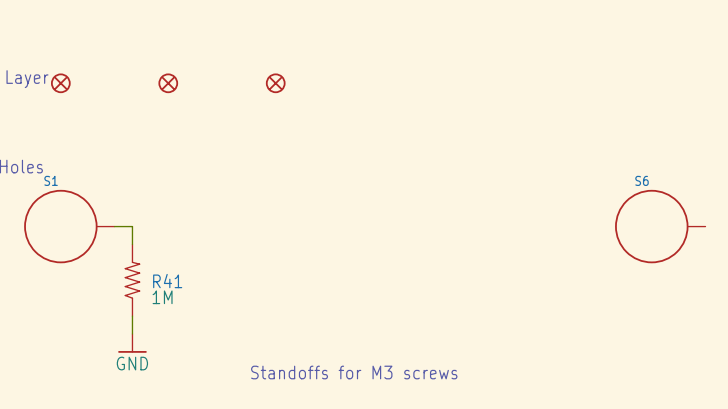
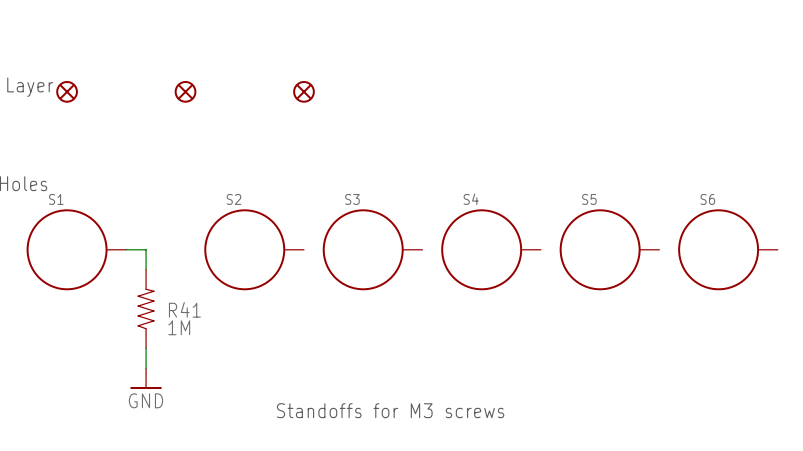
S2: none -> (254, 249)
S3: none -> (372, 249)
S4: none -> (491, 249)
S5: none -> (609, 249)

